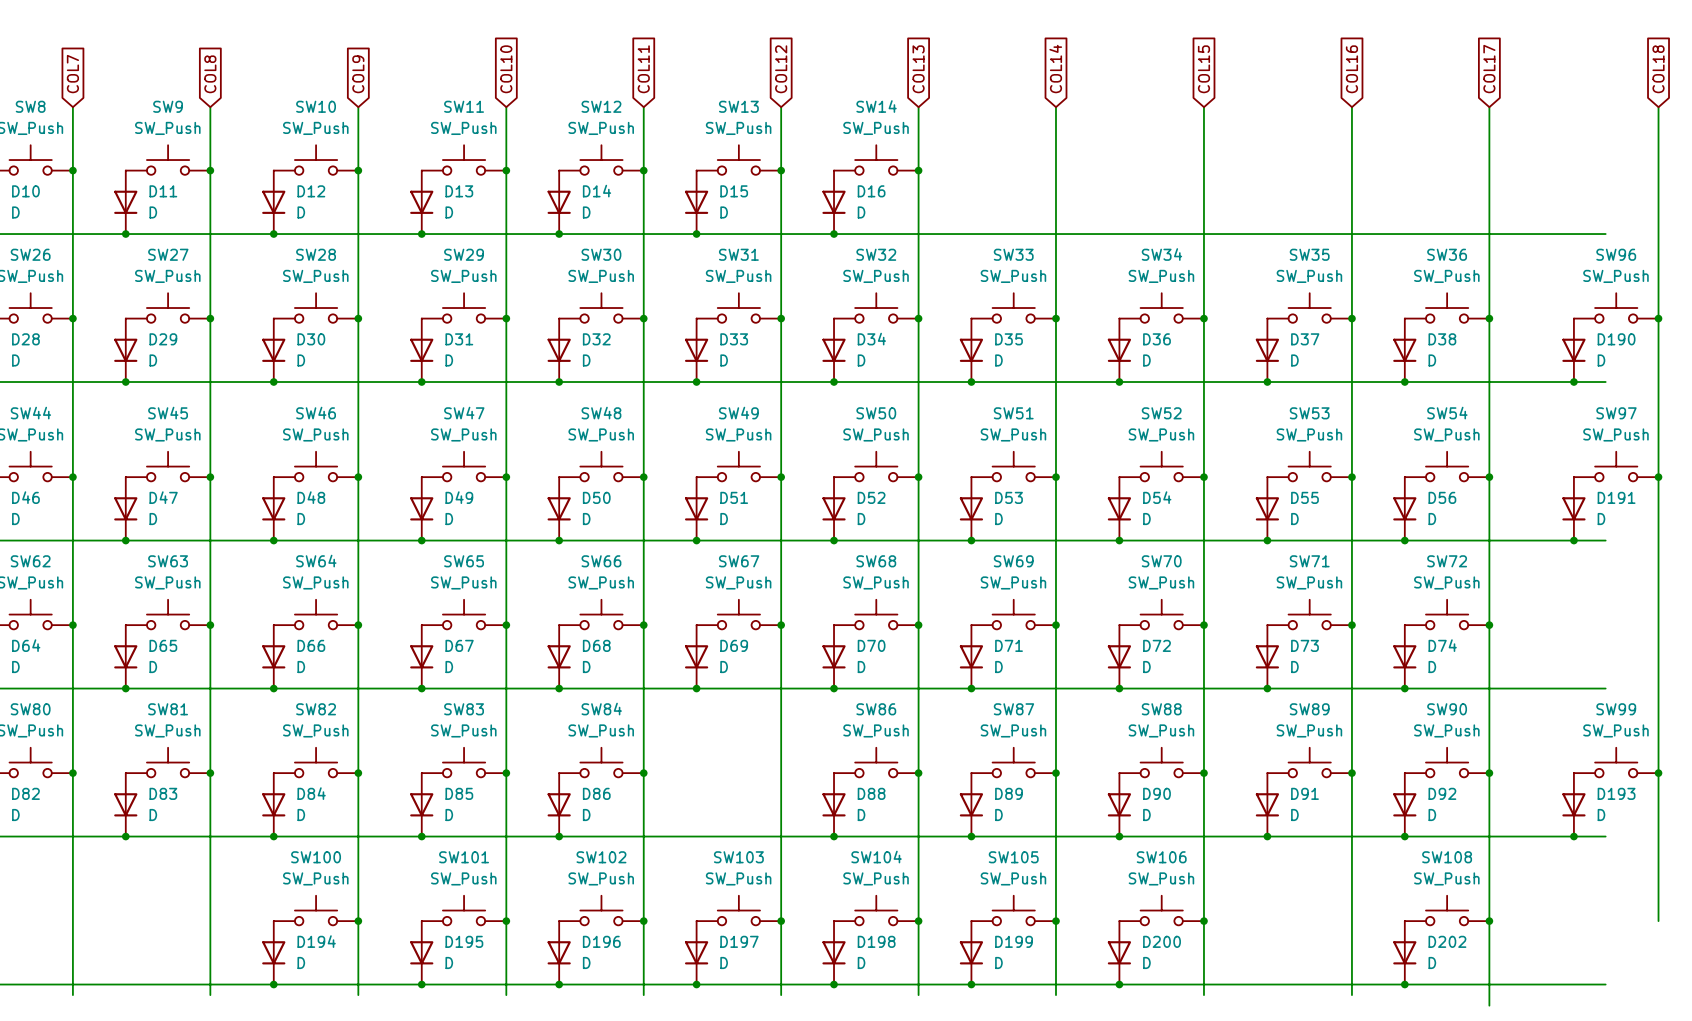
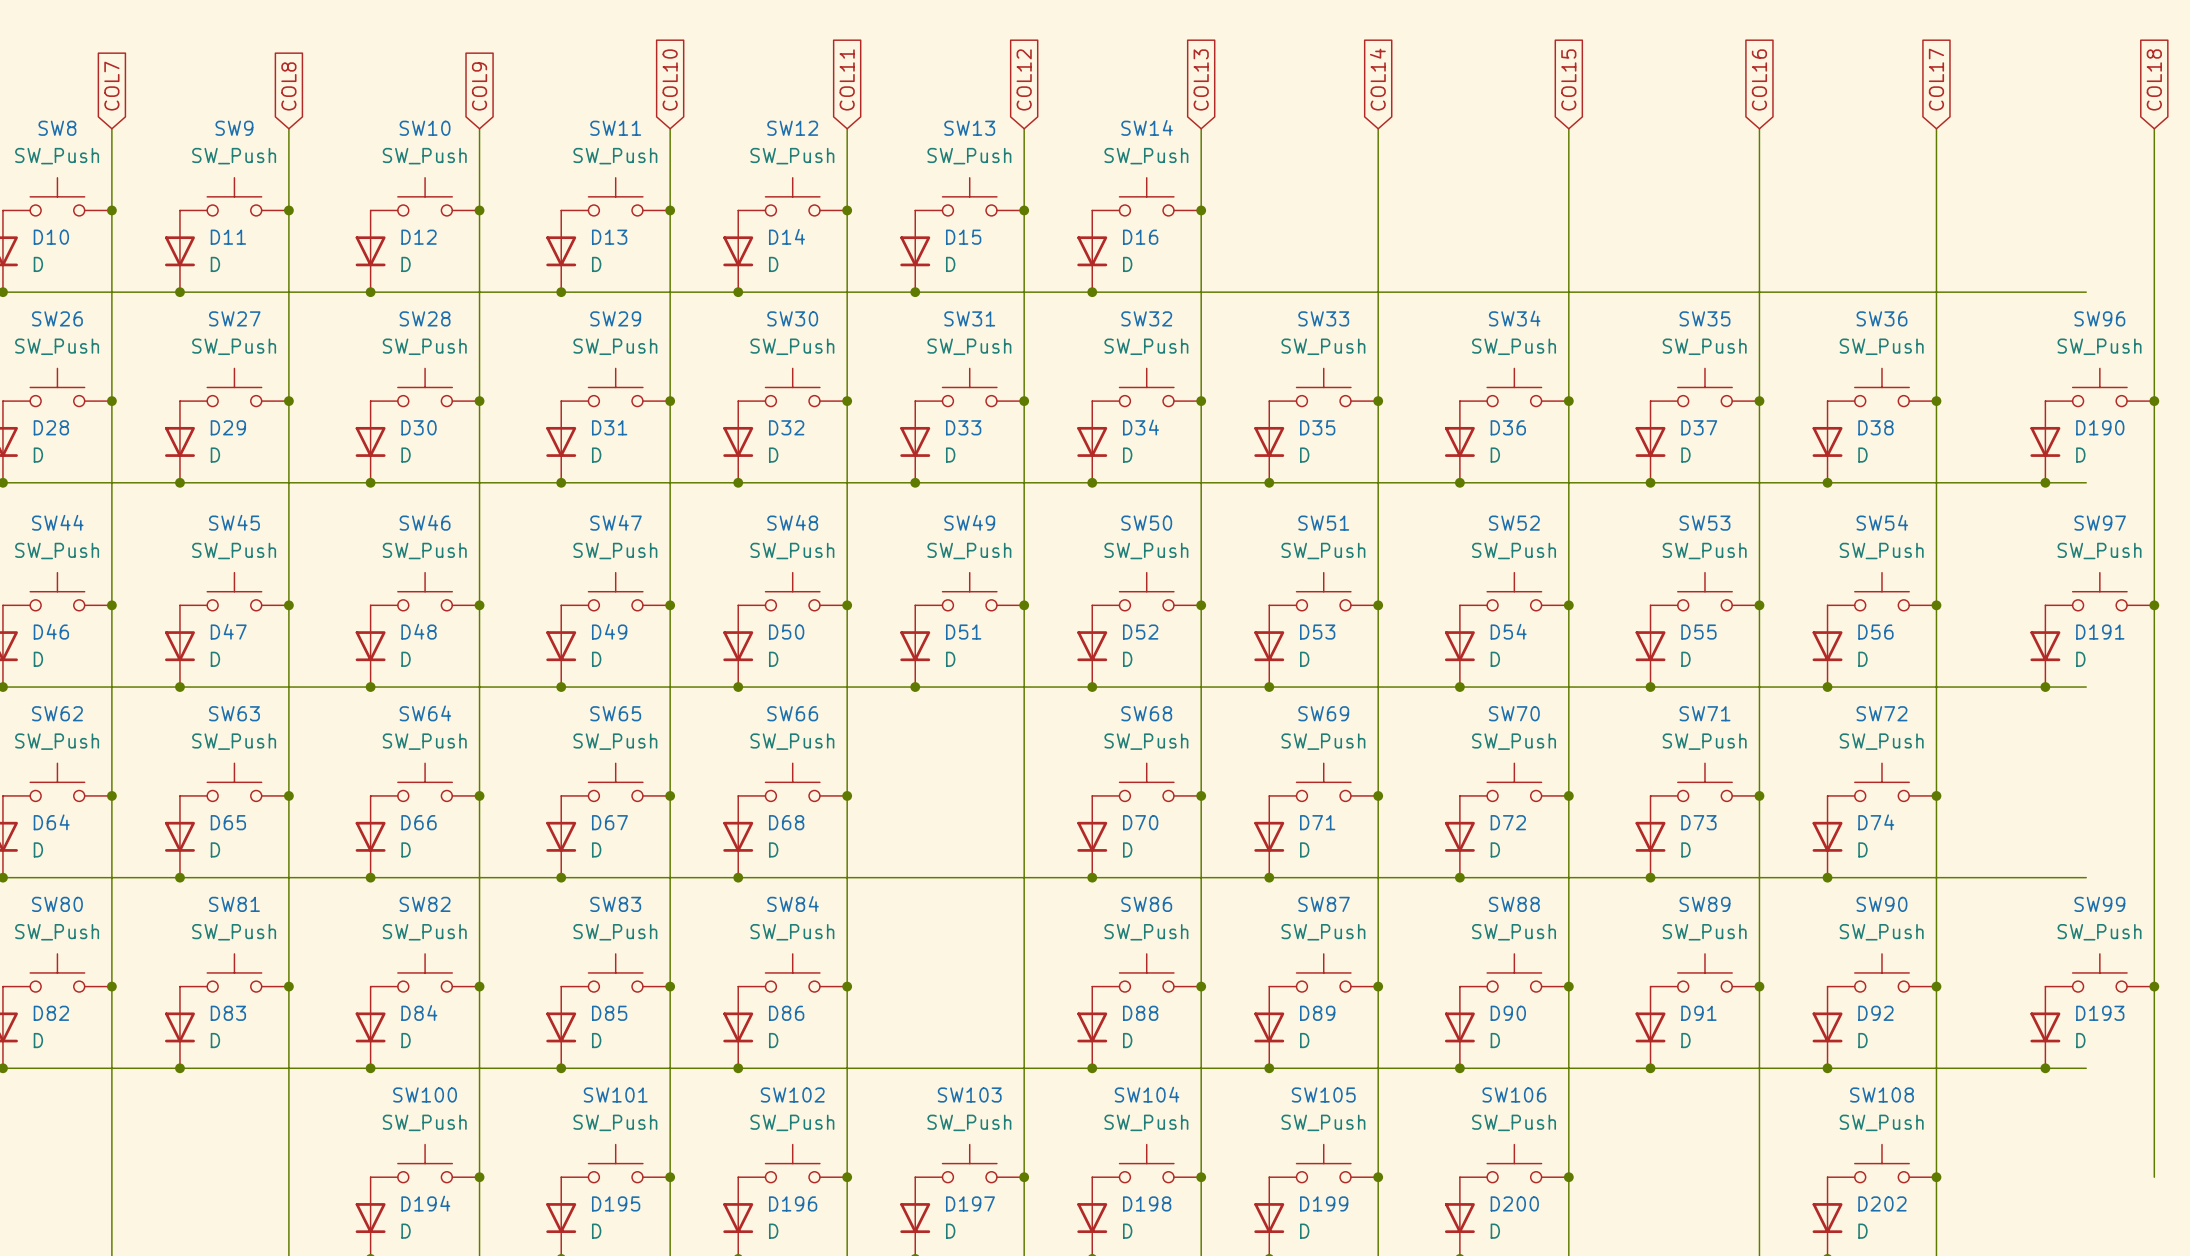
SW67: SW_Push (738, 614) -> none
junction: (781, 625) -> none
D69: D (696, 656) -> none
junction: (696, 688) -> none

